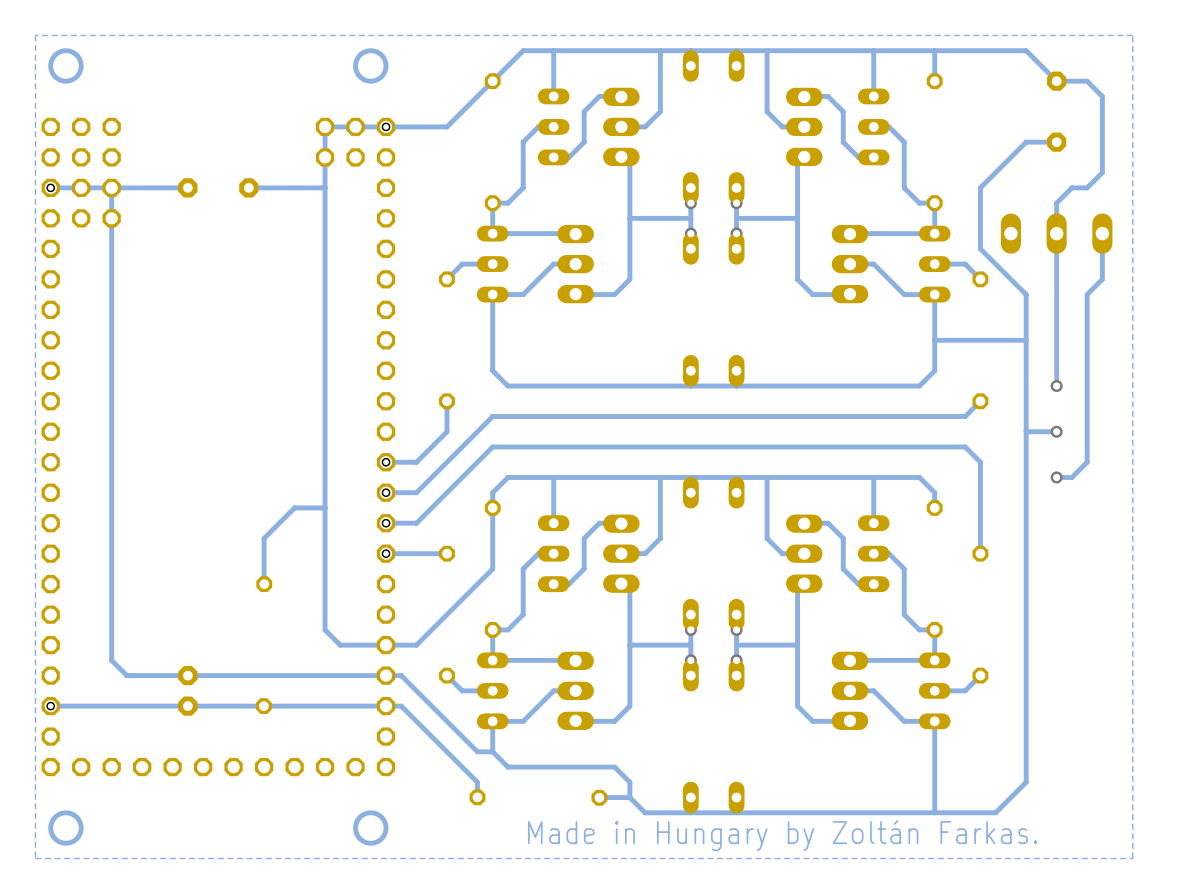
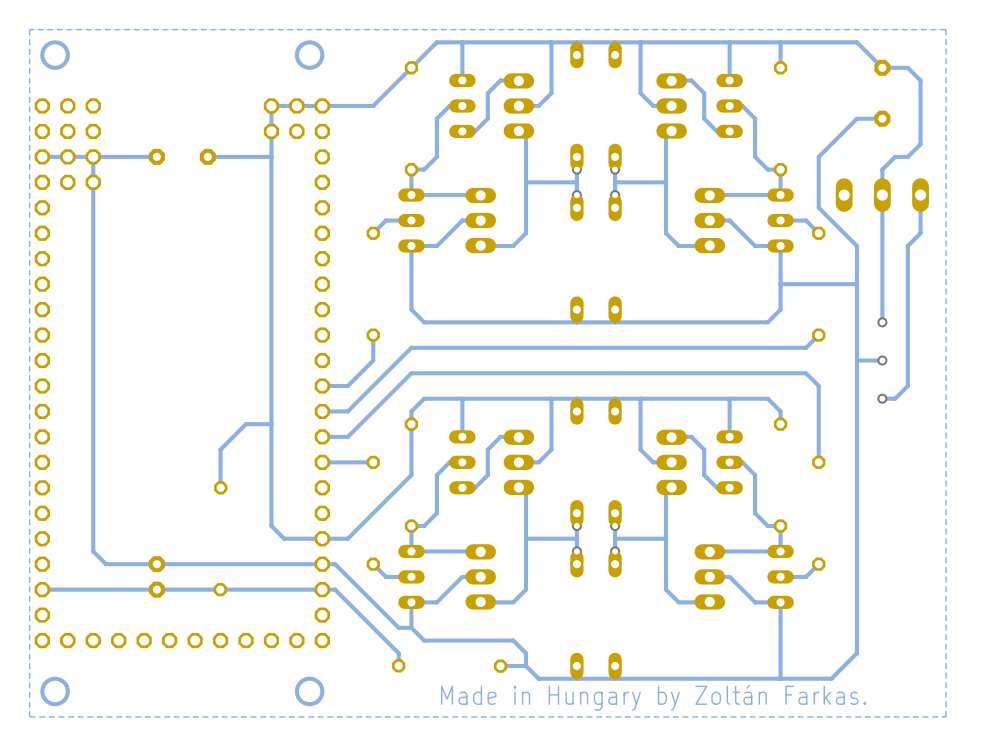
hole: (386, 126) -> none
hole: (50, 187) -> none
hole: (386, 462) -> none
hole: (386, 492) -> none
hole: (386, 523) -> none
hole: (386, 553) -> none
hole: (50, 706) -> none

